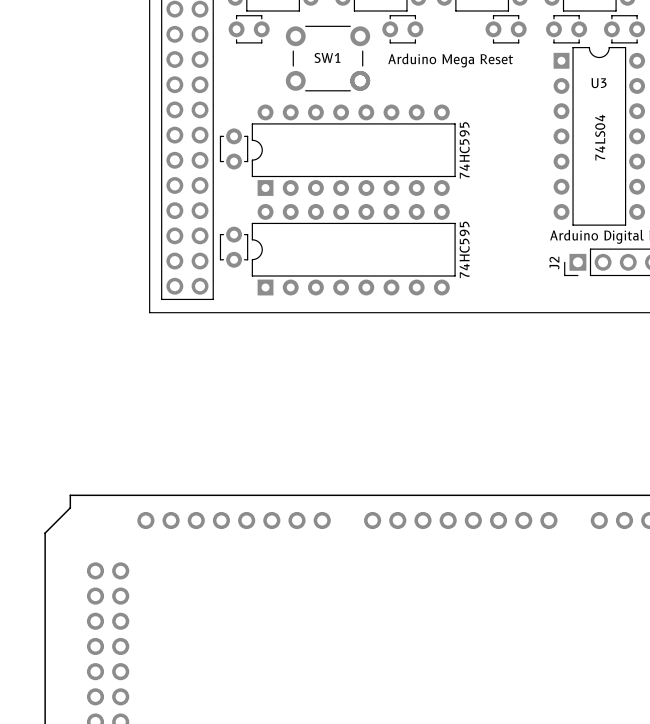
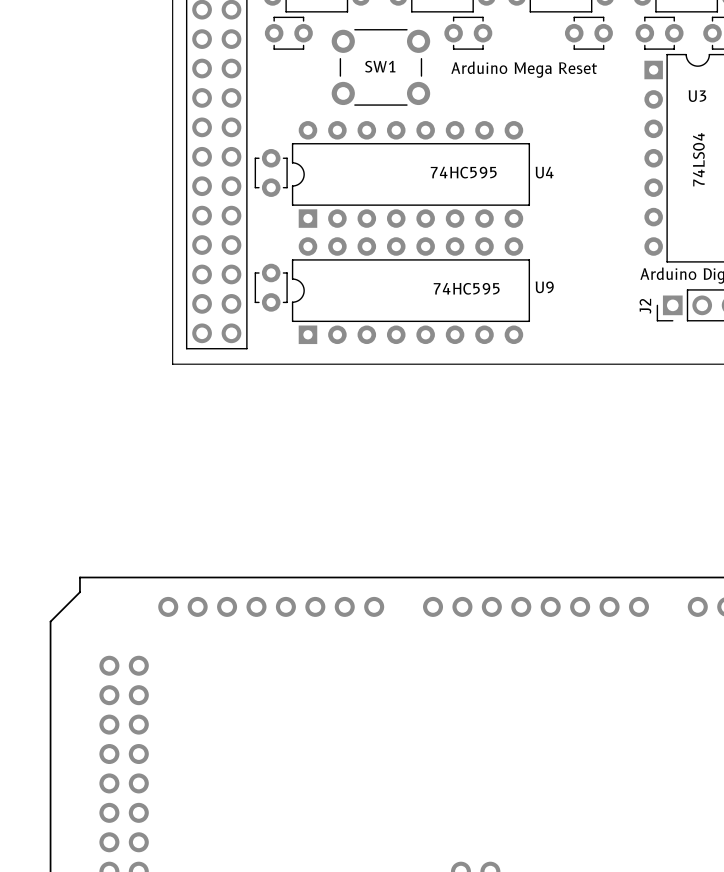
part: (360, 80) -> none
U4 name: none -> U4 (544, 172)
U4 value rotation: 0° (464, 150) -> 90° clockwise (463, 172)
U9 name: none -> U9 (544, 287)
U9 value rotation: 0° (464, 249) -> 90° clockwise (466, 288)

